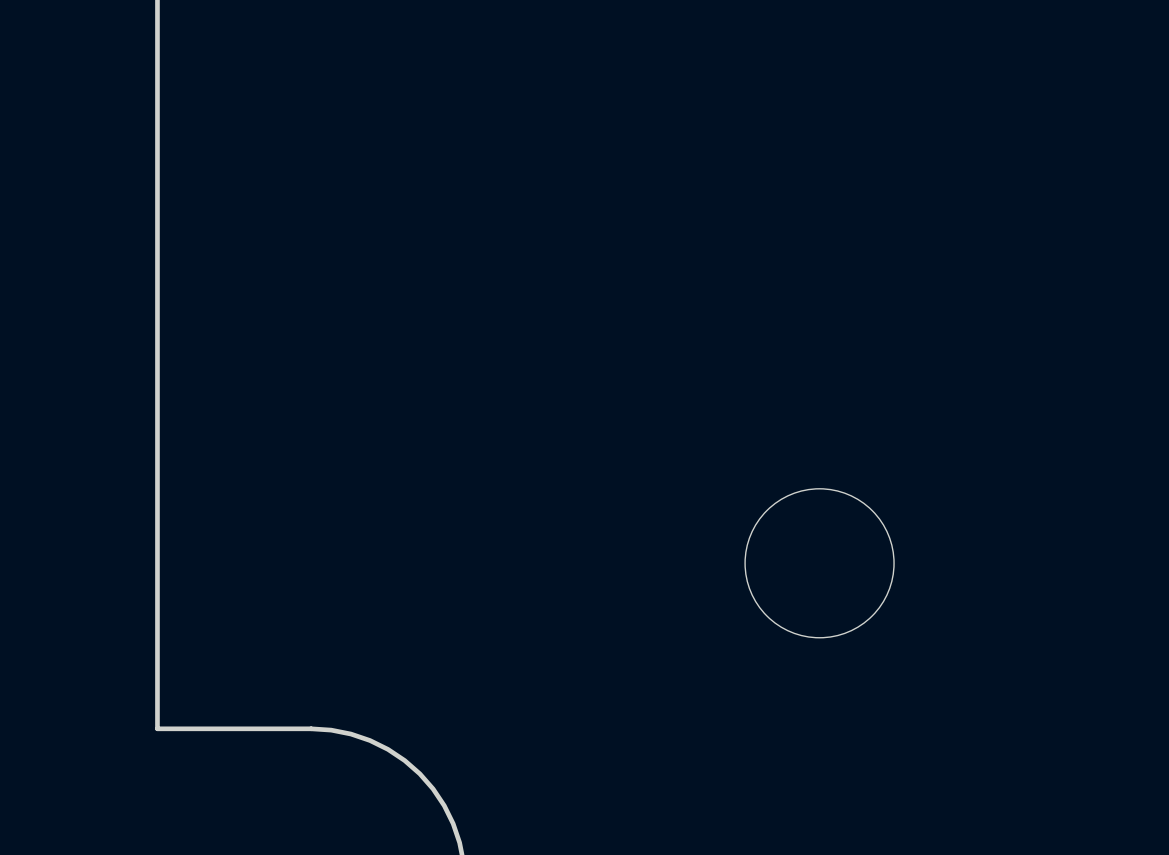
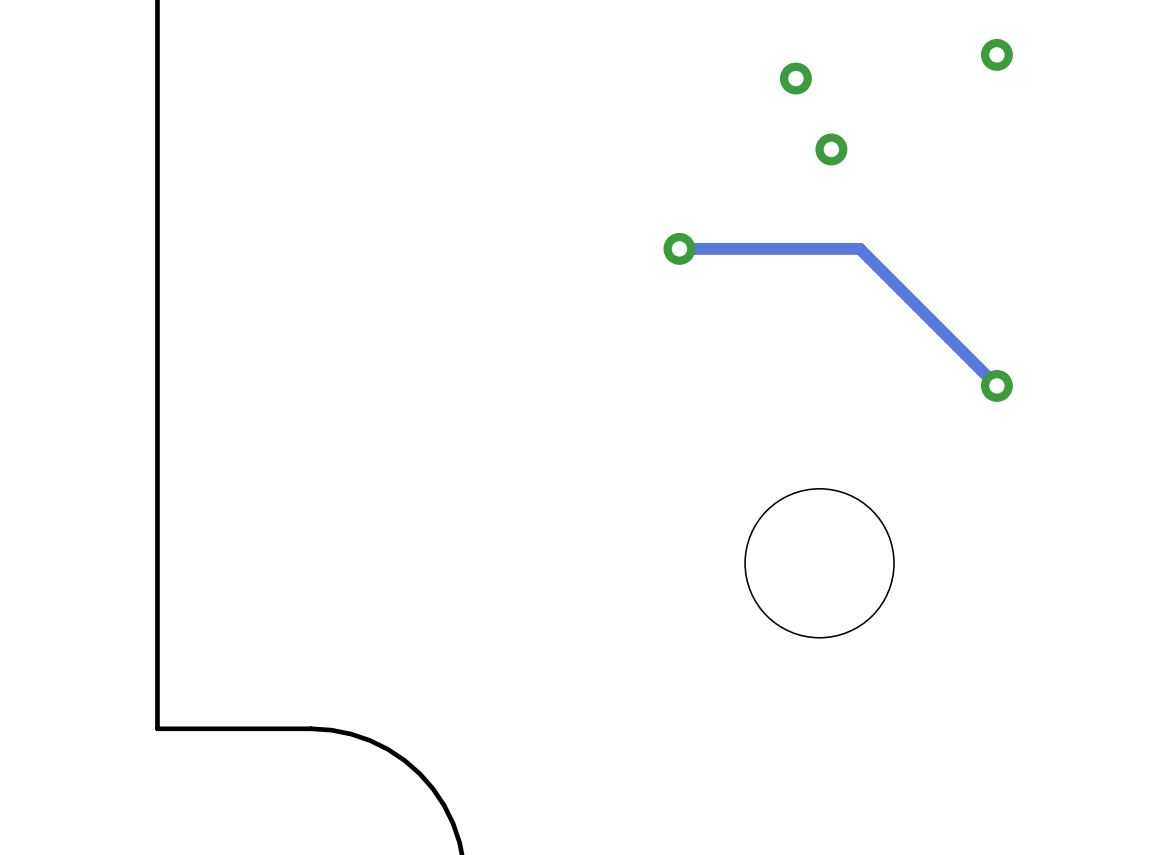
via: none -> (996, 54)
via: none -> (795, 78)
via: none -> (831, 149)
track: none -> (679, 248) (859, 248) (996, 385)
via: none -> (679, 248)
via: none -> (996, 385)

